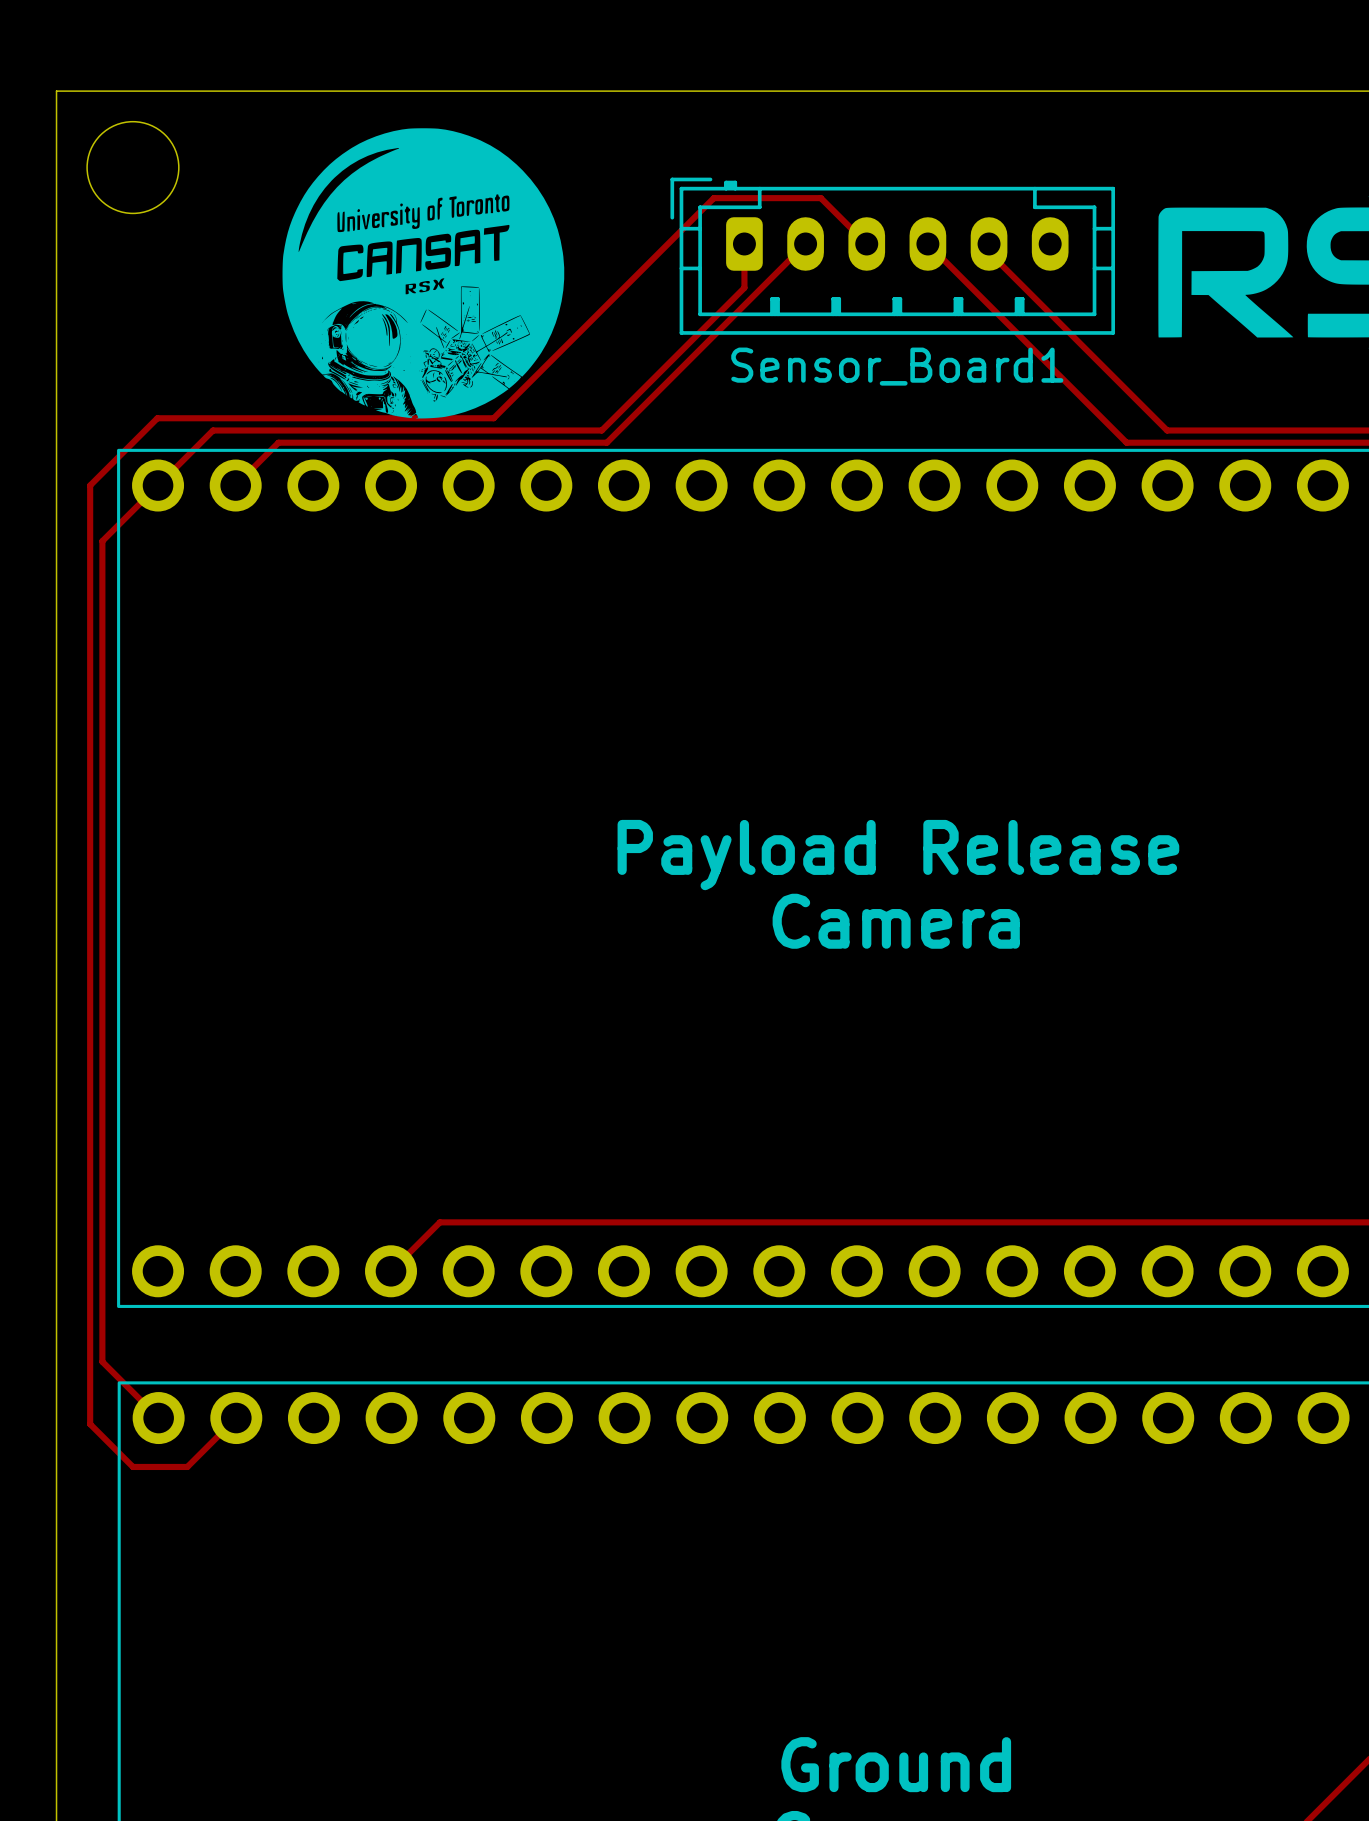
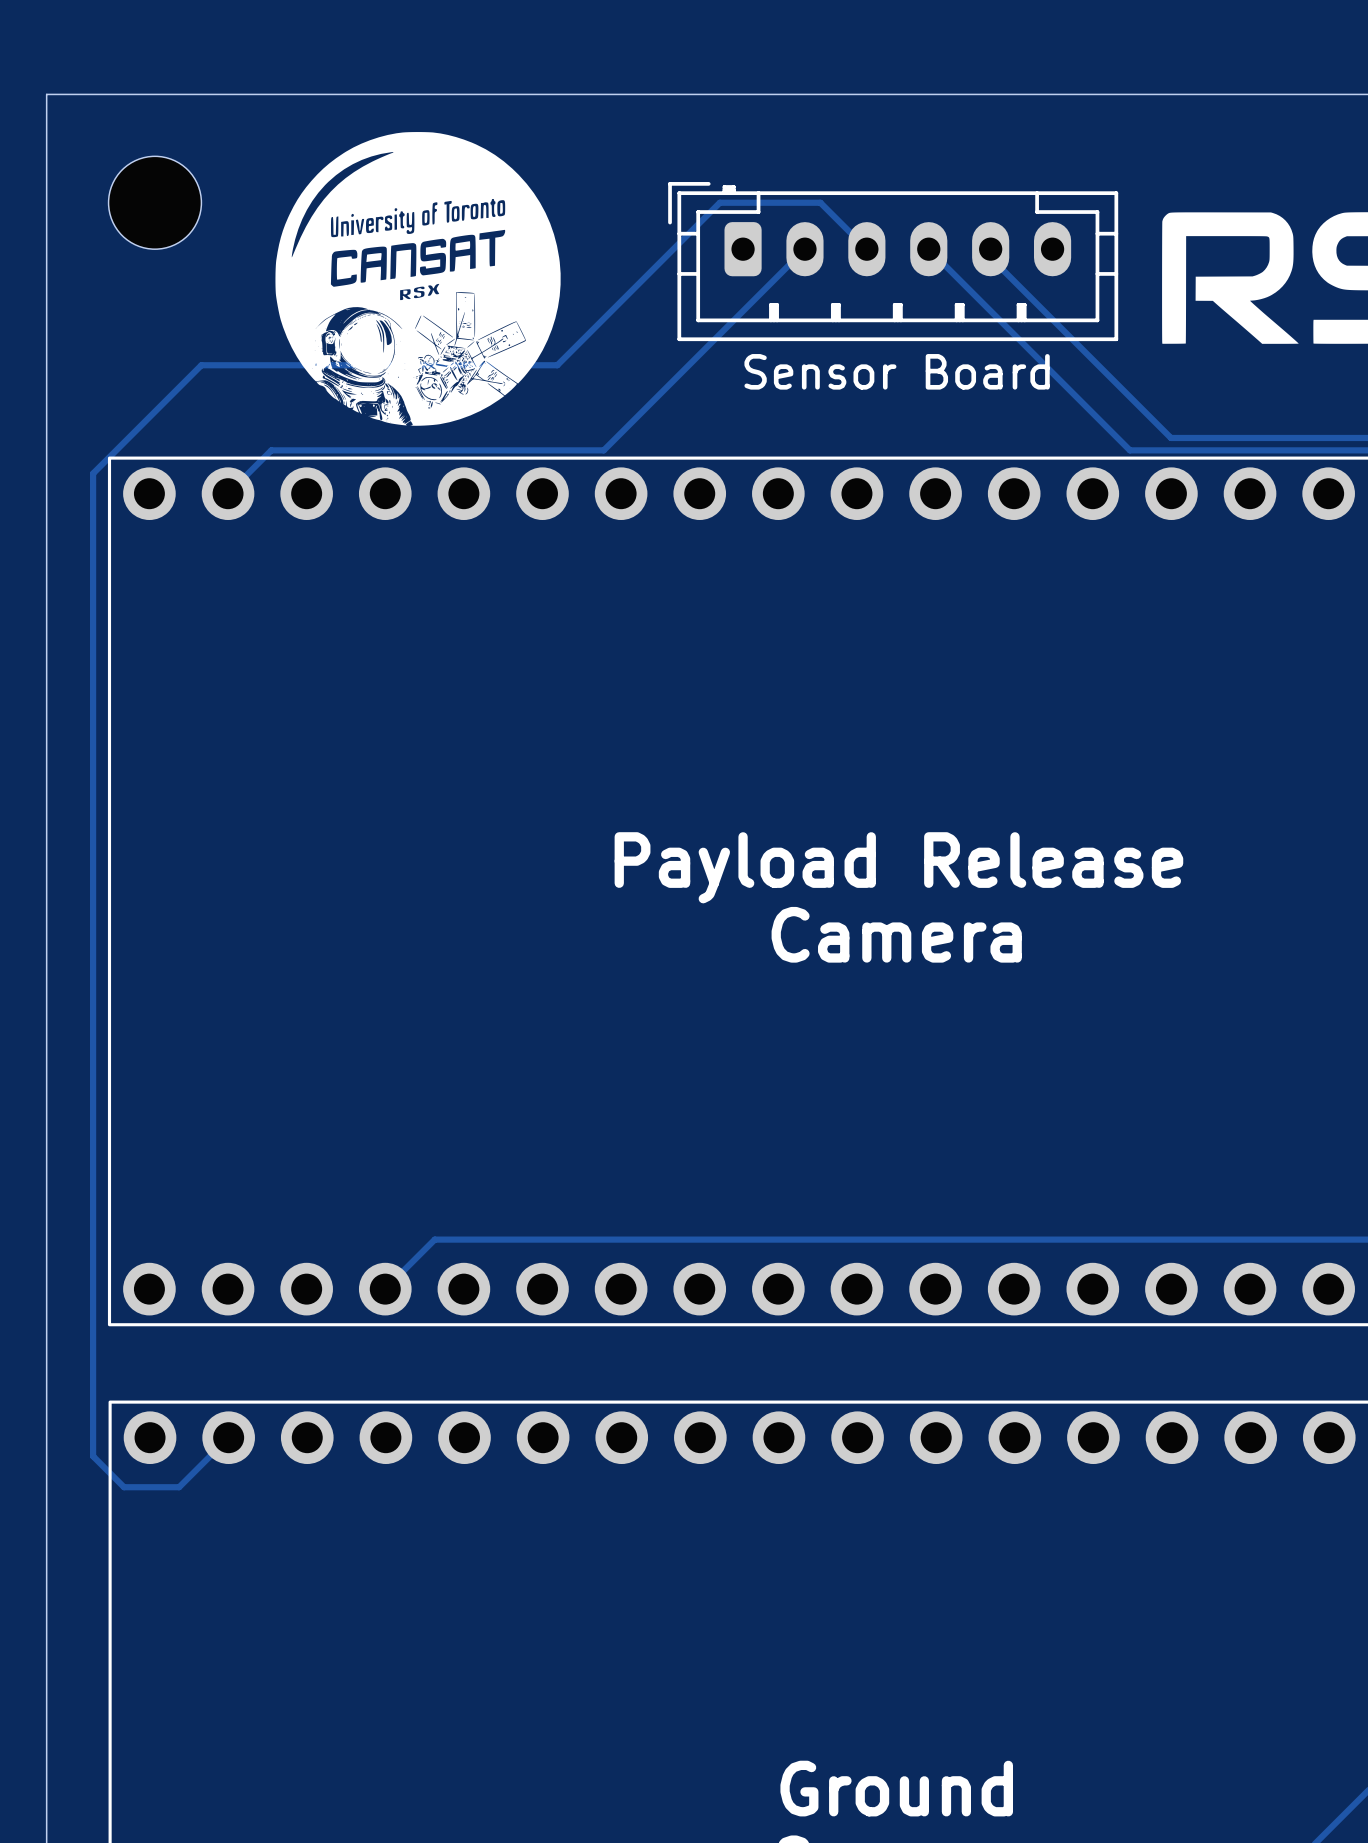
round board edge: [86, 120, 180, 215] -> none
part: none -> (154, 202)
track: (721, 198) (713, 198) (493, 418) (157, 418) (90, 485) (90, 1424) (102, 1436) -> none
track: (744, 243) (744, 287) (601, 430) (213, 430) (102, 541) -> (719, 202) (557, 365) (201, 365) (93, 473) (93, 550)
Sensor_Board1 value: none -> Sensor Board (897, 371)
Sensor_Board1 name: Sensor_Board1 (897, 366) -> none
track: (102, 1361) (158, 1418) -> (93, 1380) (93, 1456)

